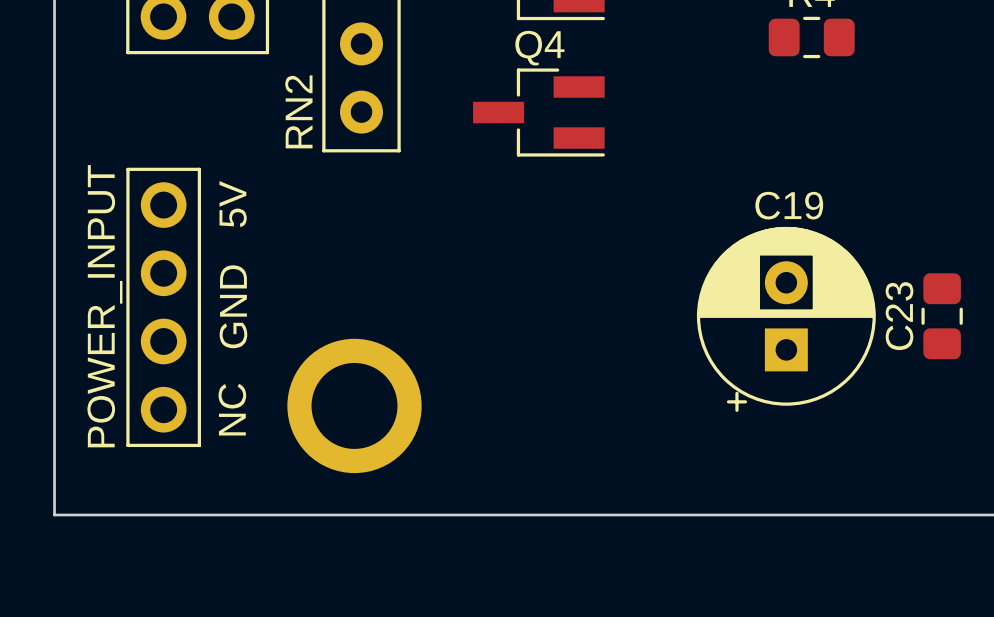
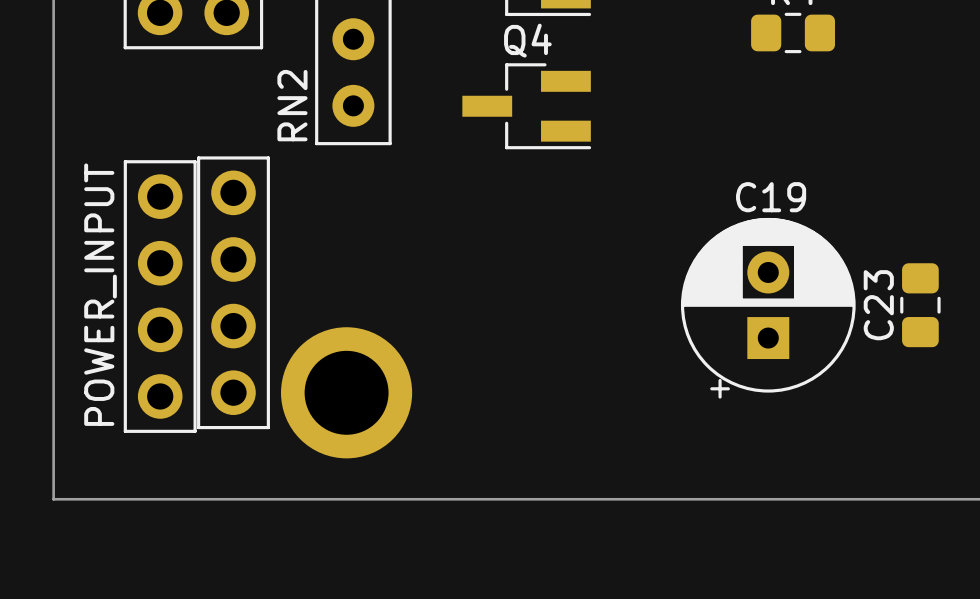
text: 5V (233, 204) -> none
part: none -> (233, 292)
text: GND (233, 306) -> none
text: NC (232, 409) -> none

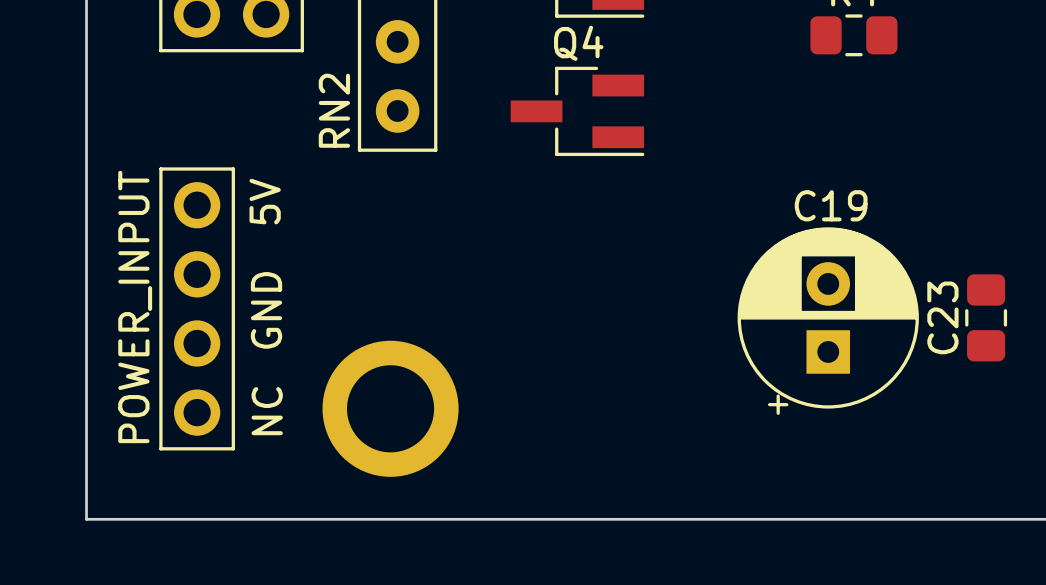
text: none -> 5V (265, 201)
part: (233, 292) -> none
text: none -> GND (266, 310)
text: none -> NC (267, 411)

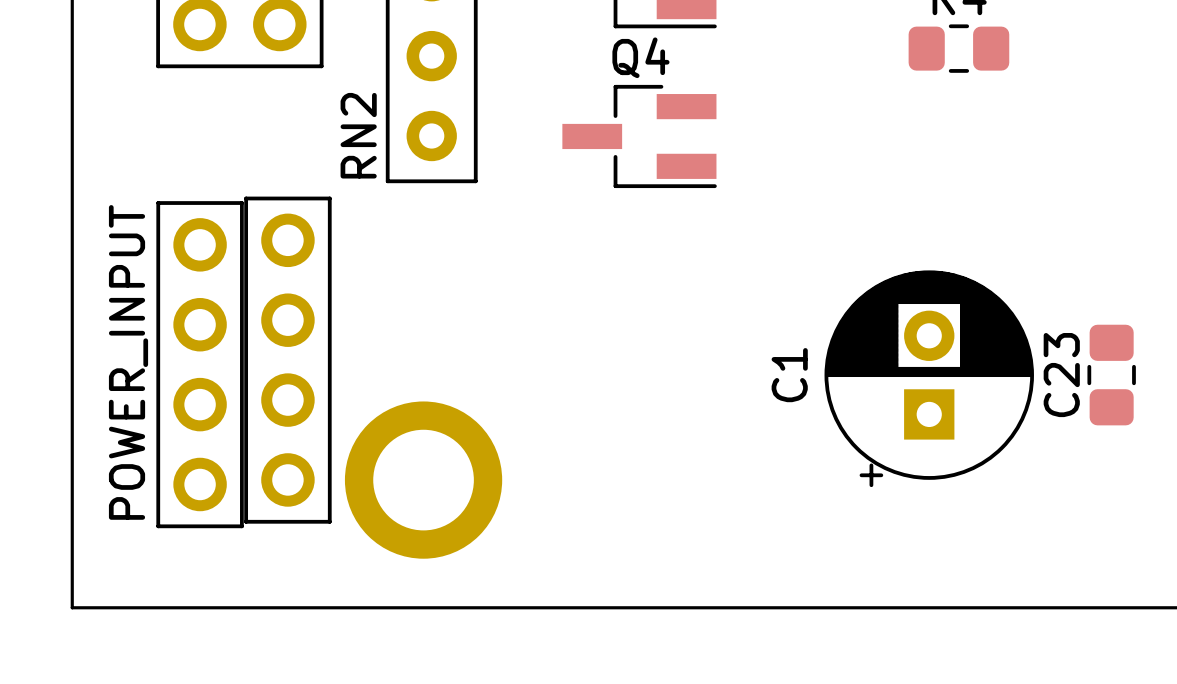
text: 5V (265, 201) -> none
C19 name: C19 (831, 205) -> C1 (789, 375)
part: none -> (287, 360)
text: GND (266, 310) -> none
text: NC (267, 411) -> none

